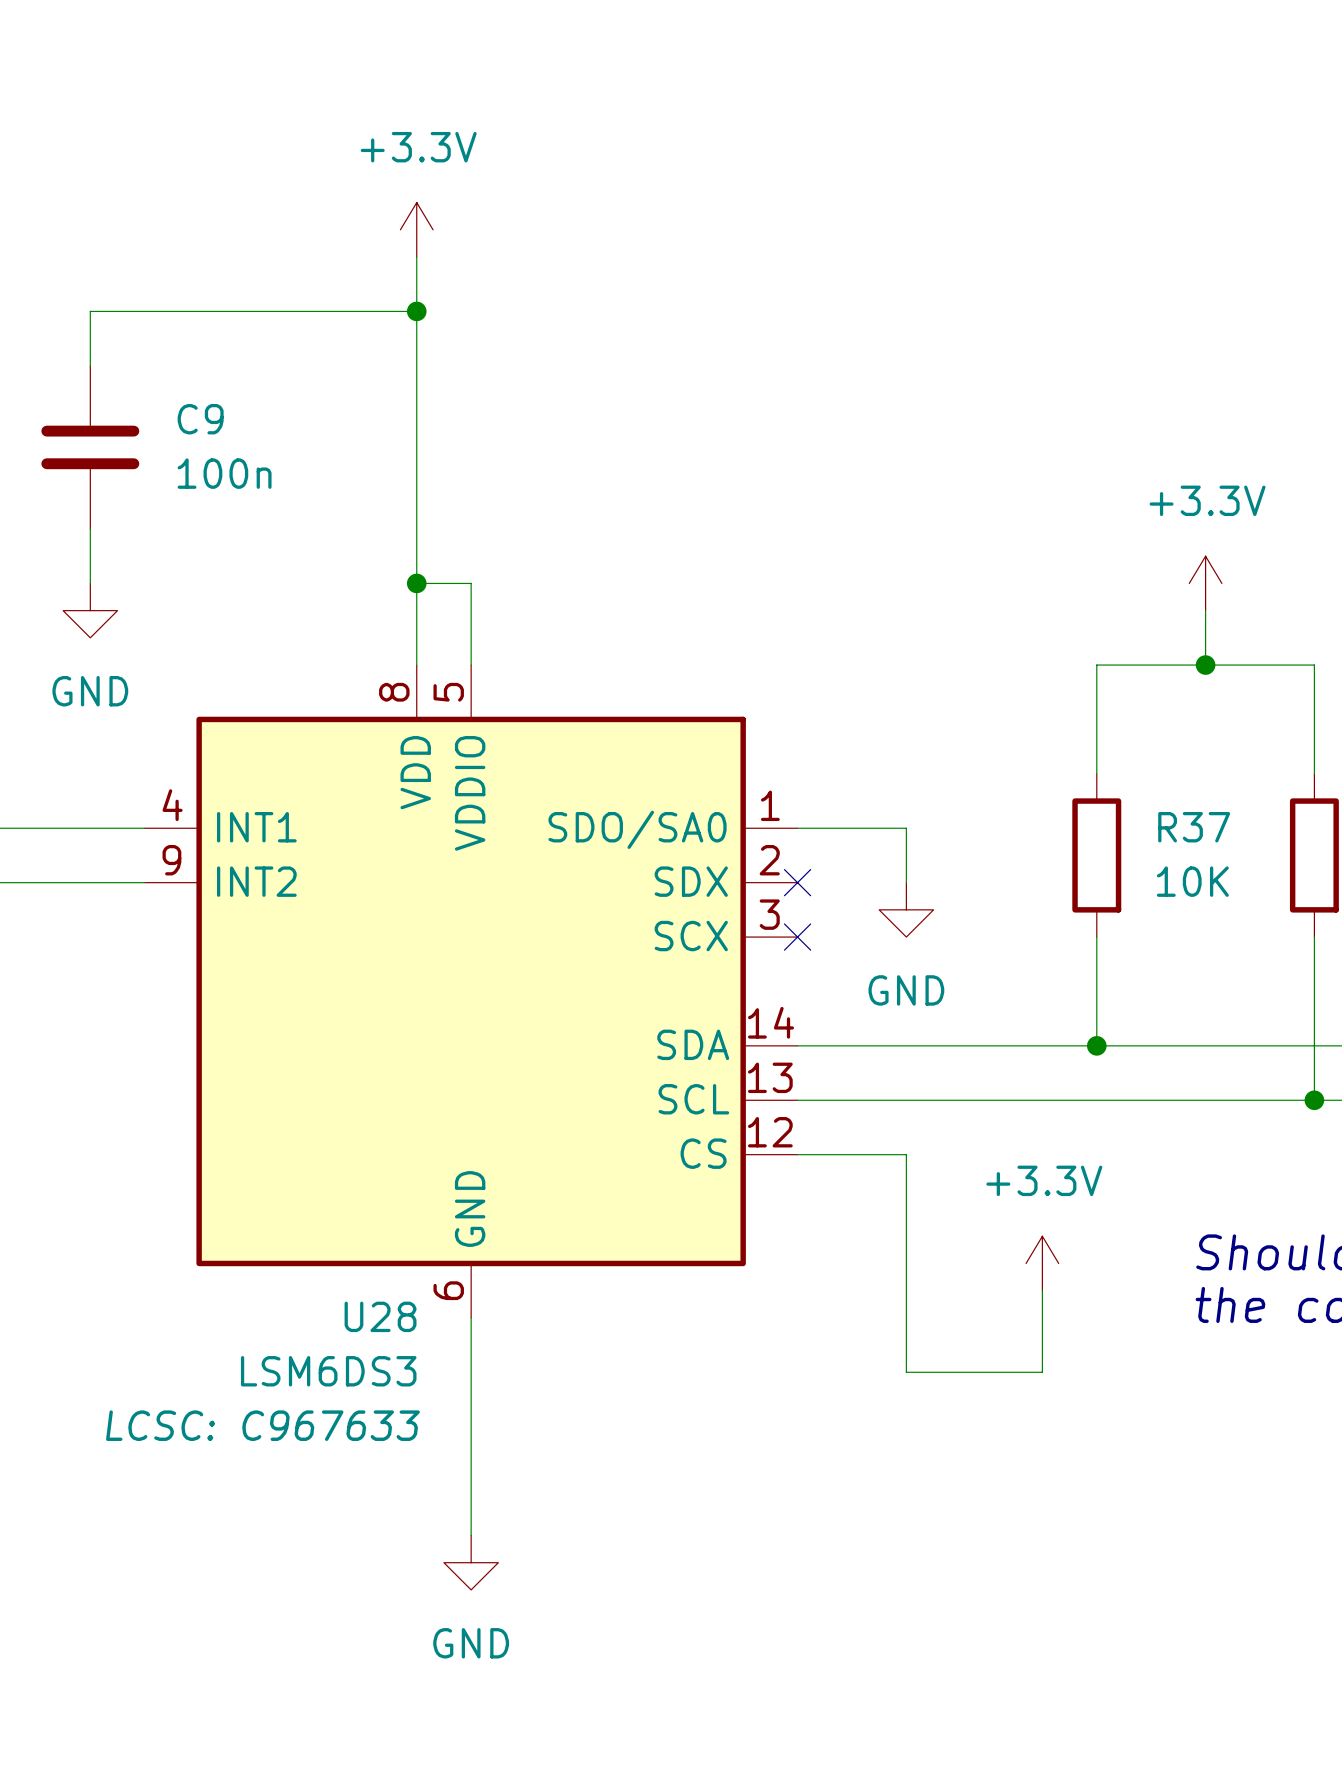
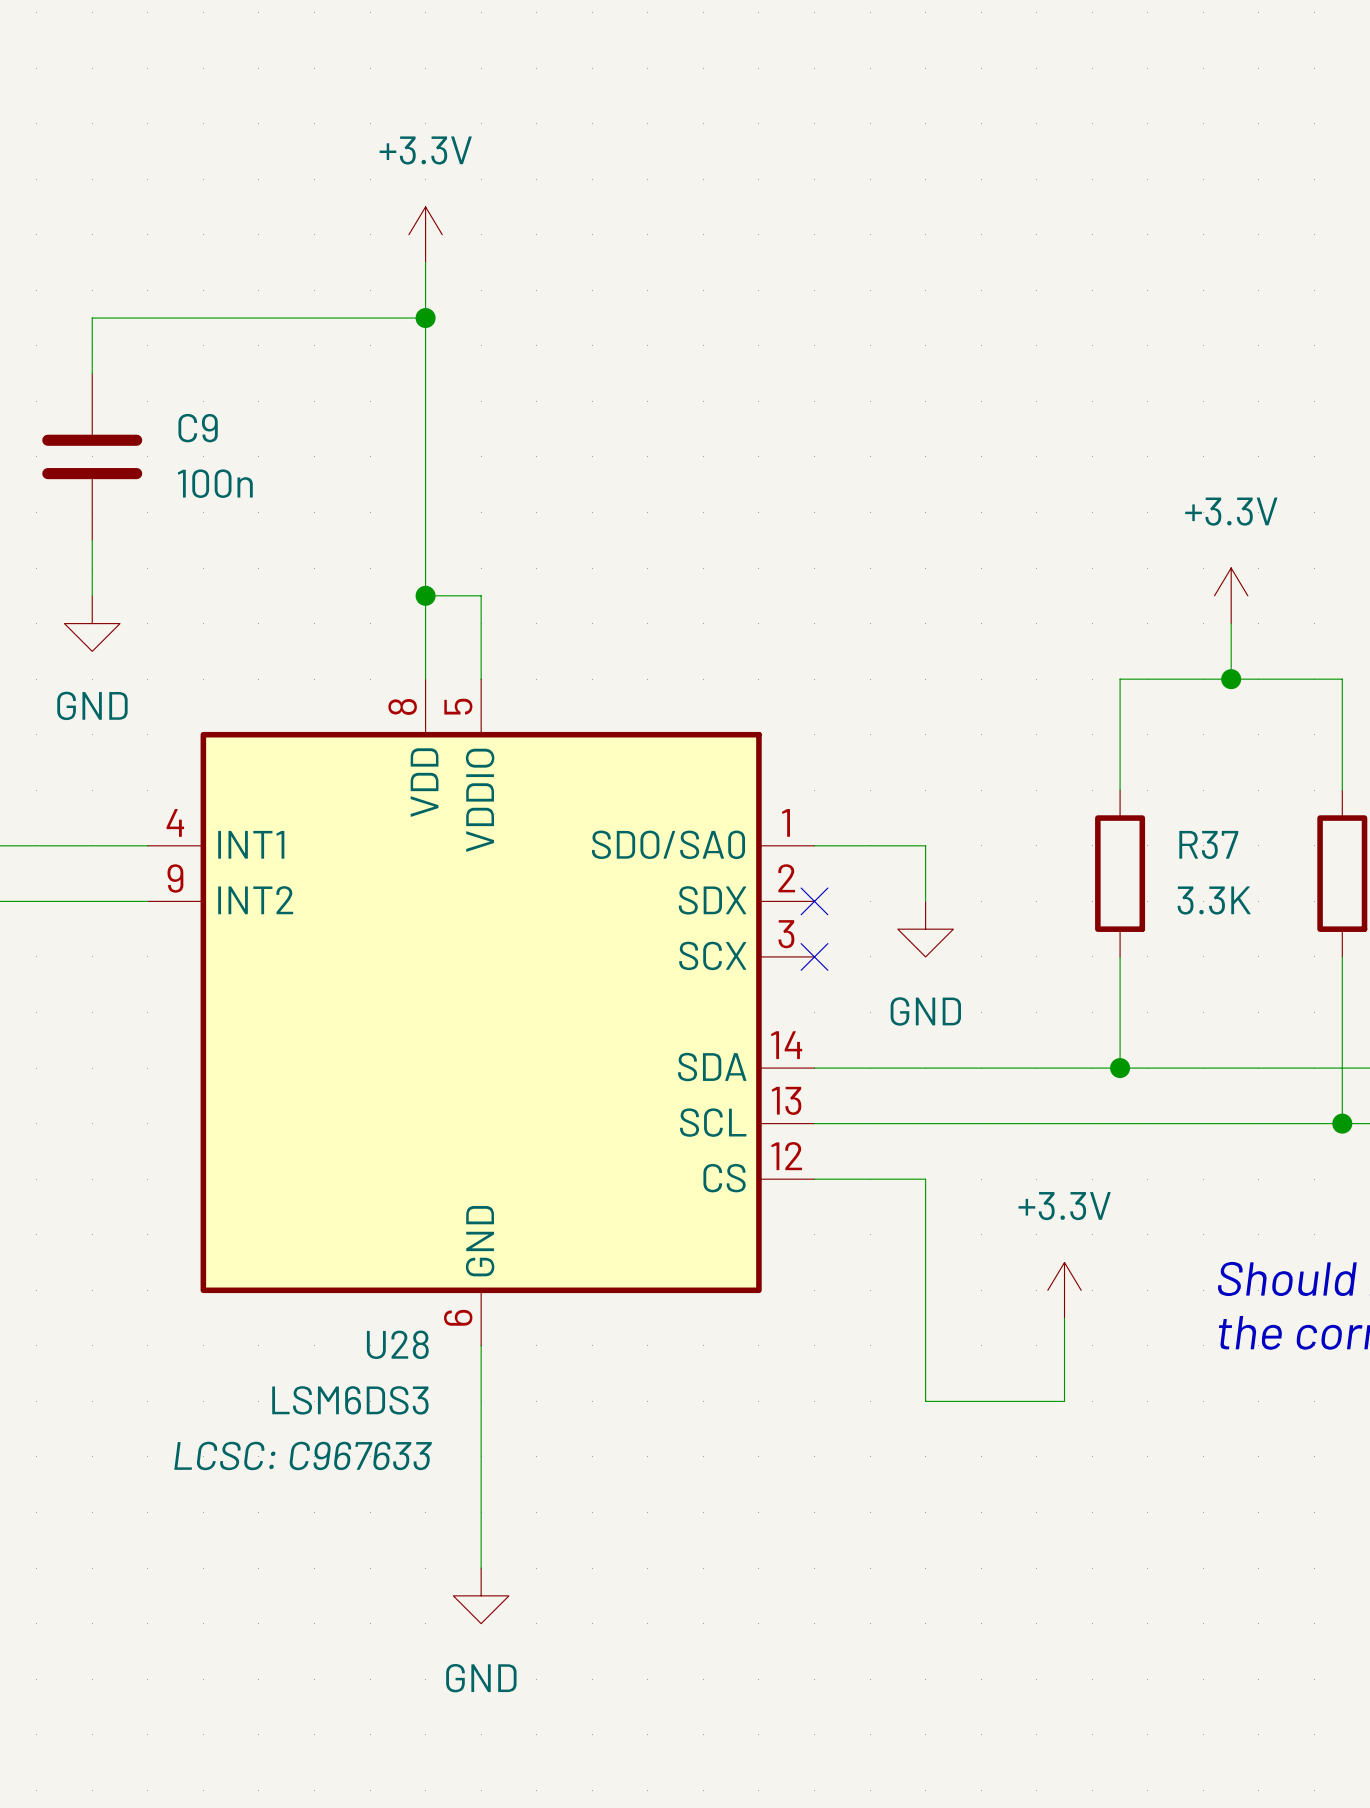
R37 value: 10K (1192, 881) -> 3.3K (1214, 900)

